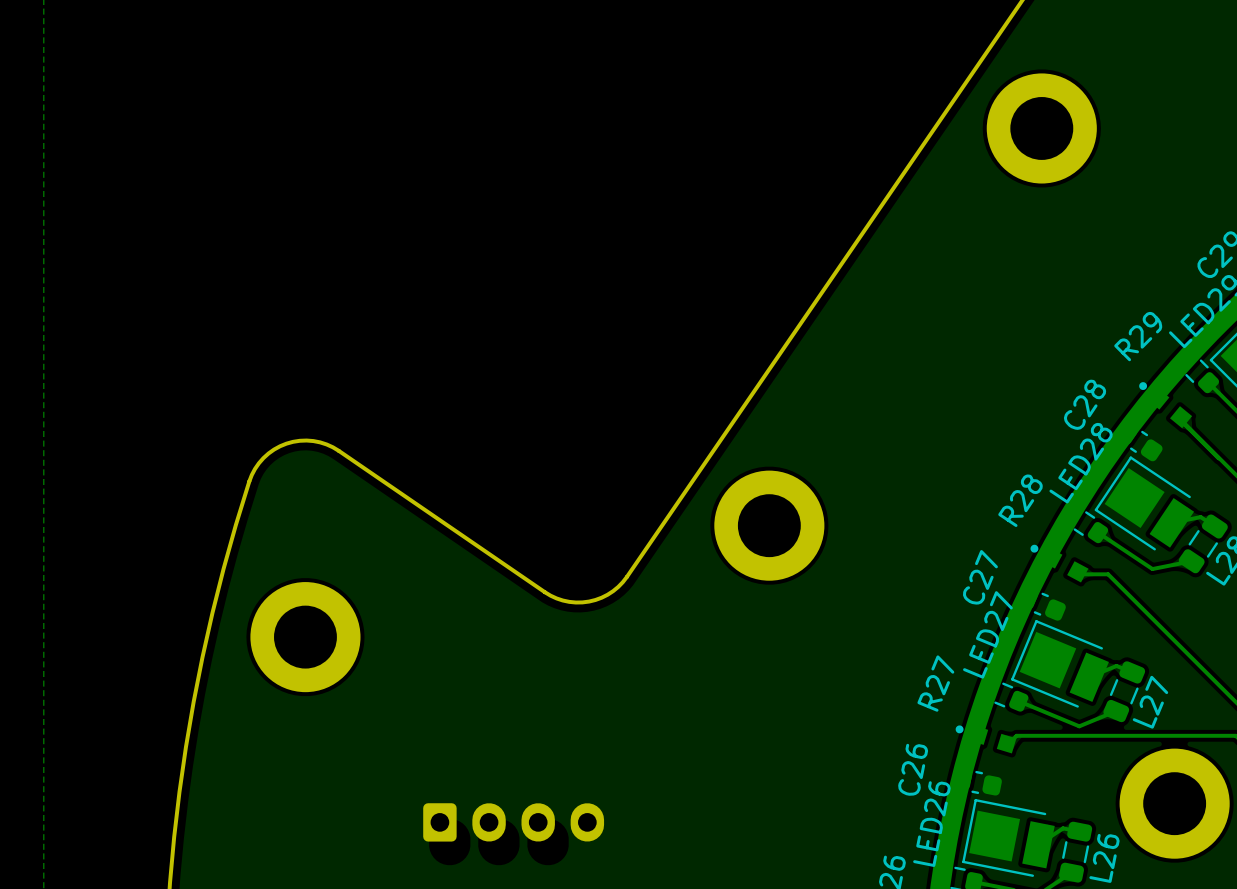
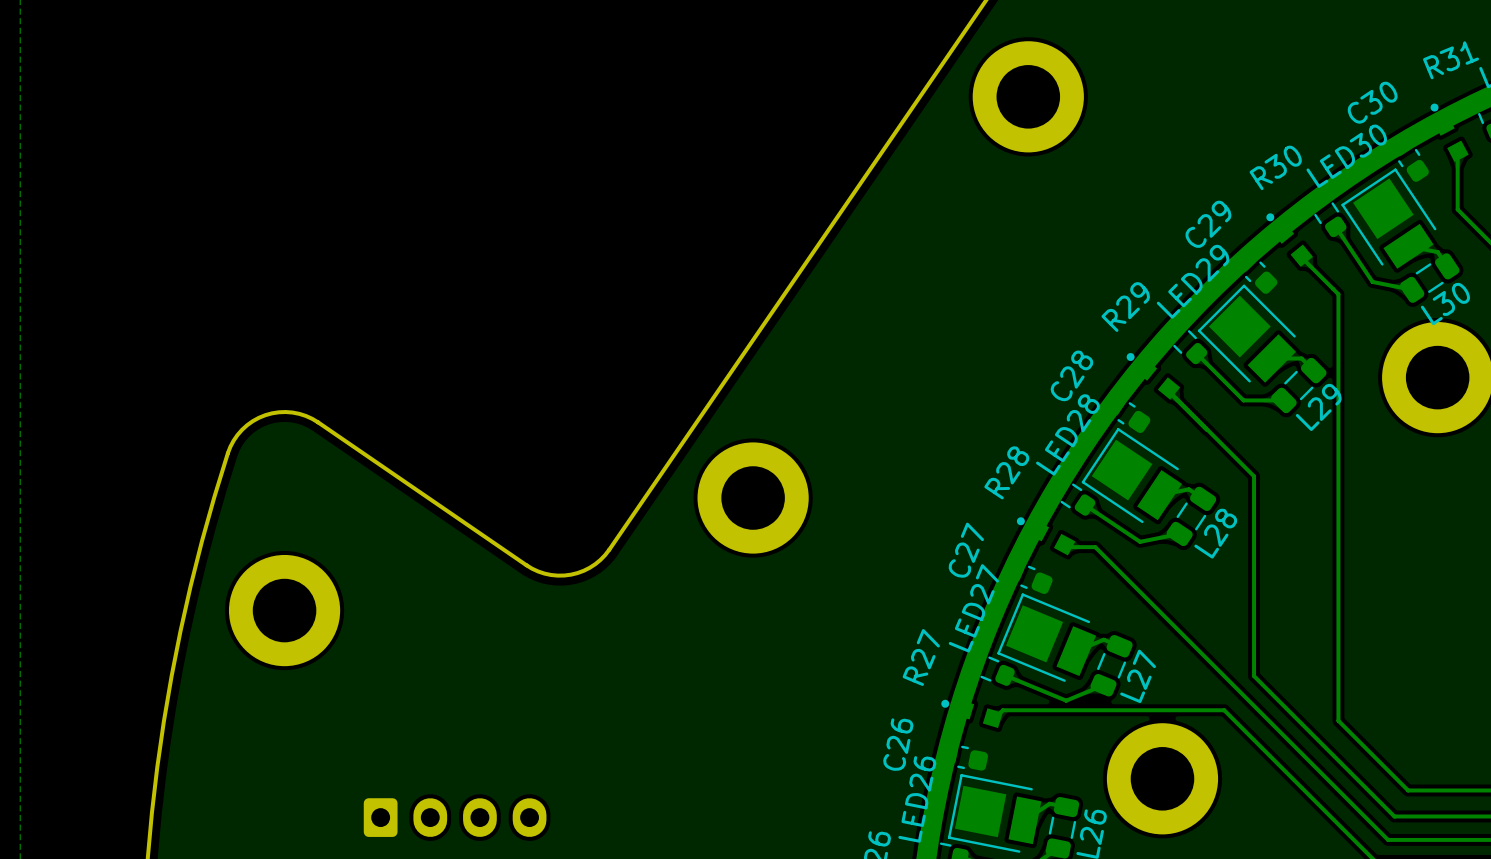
part position: (513, 822) -> (455, 817)

